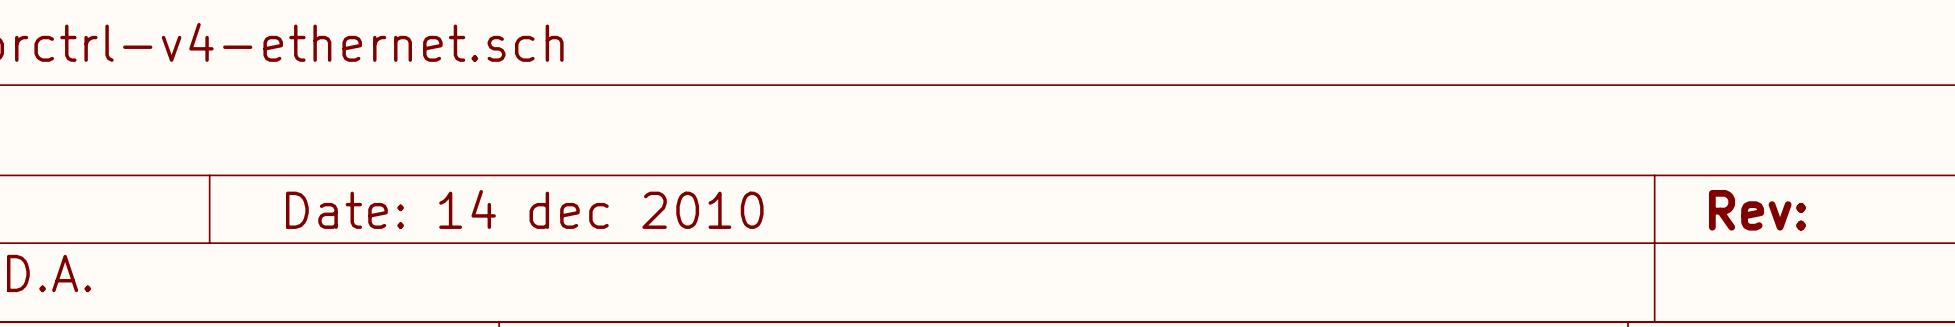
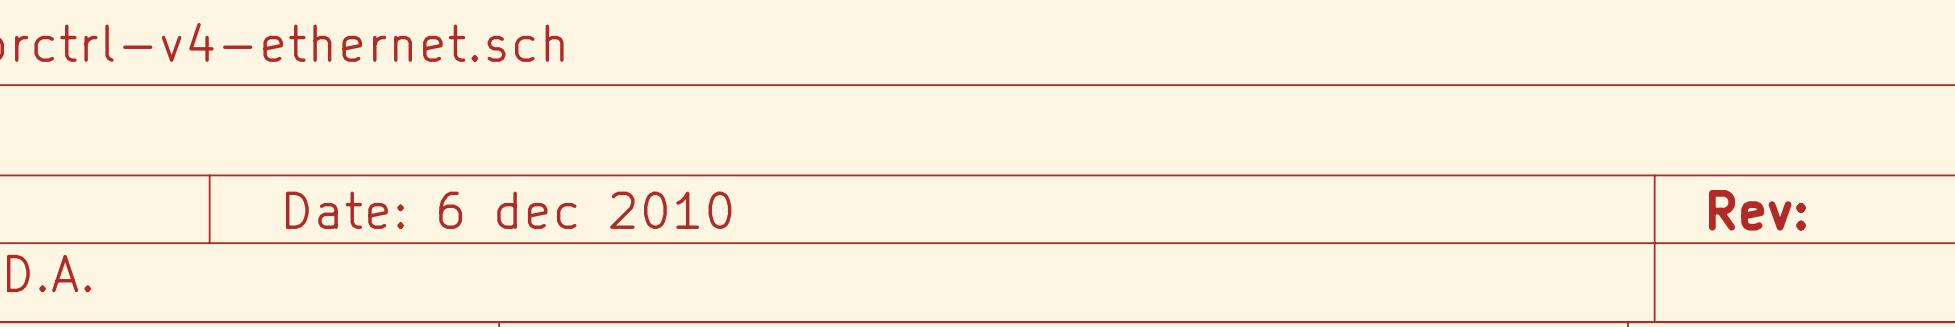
title block: Date: 14 dec 2010 (524, 209) -> Date: 6 dec 2010 (508, 210)

